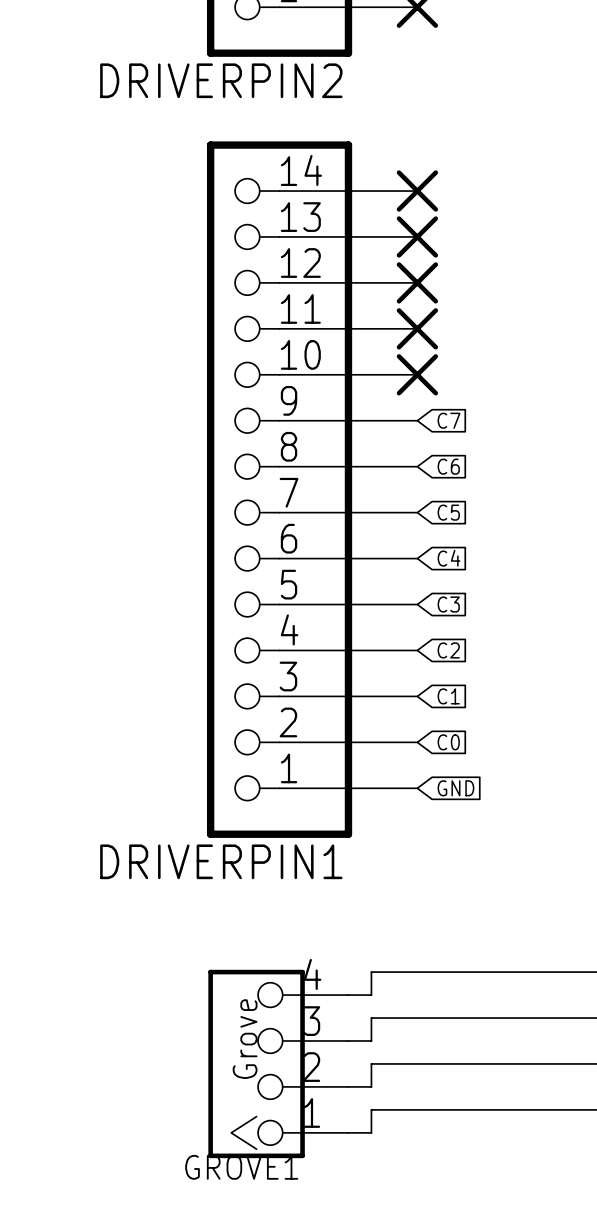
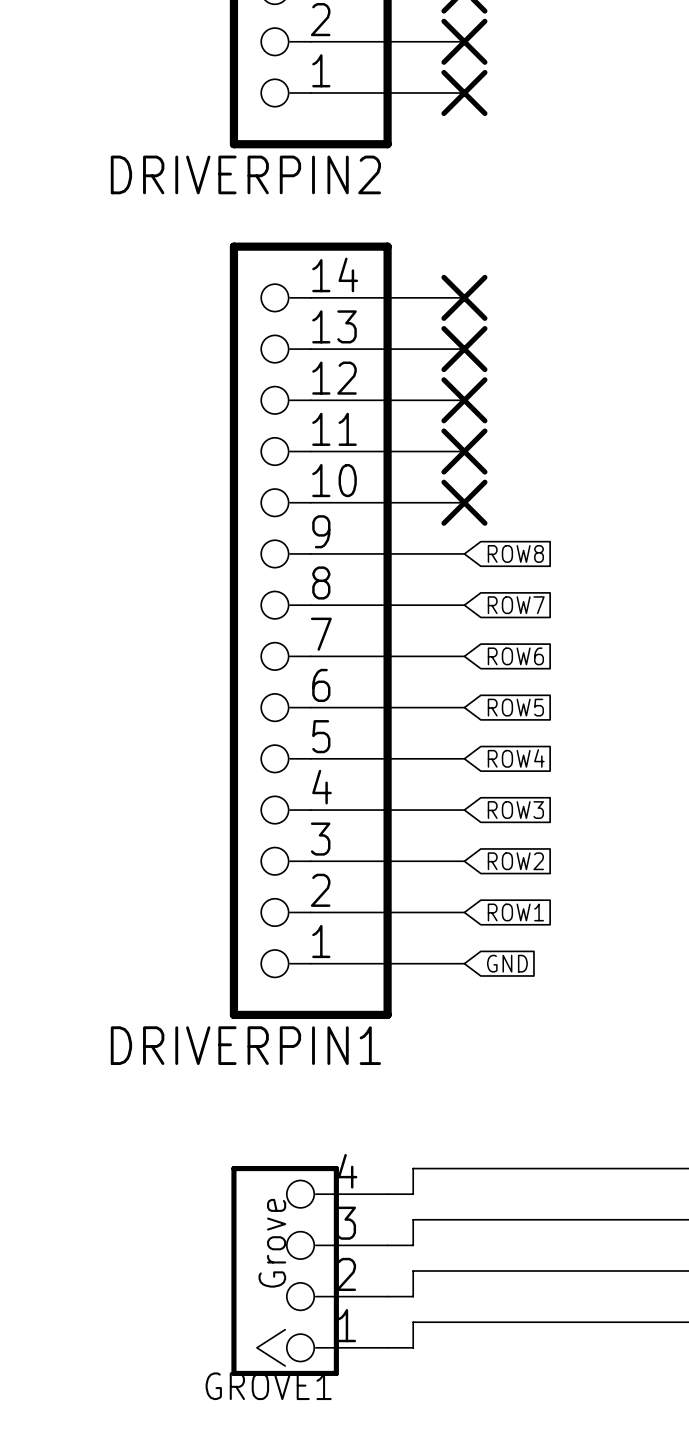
global label: C7 (449, 420) -> ROW8 (515, 553)
global label: C6 (448, 466) -> ROW7 (516, 605)
global label: C5 (448, 512) -> ROW6 (515, 656)
global label: C4 (449, 558) -> ROW5 (515, 707)
global label: C3 (448, 604) -> ROW4 (516, 758)
global label: C2 (448, 650) -> ROW3 (515, 810)
global label: C1 (448, 696) -> ROW2 (515, 861)
global label: C0 (448, 742) -> ROW1 (515, 912)

